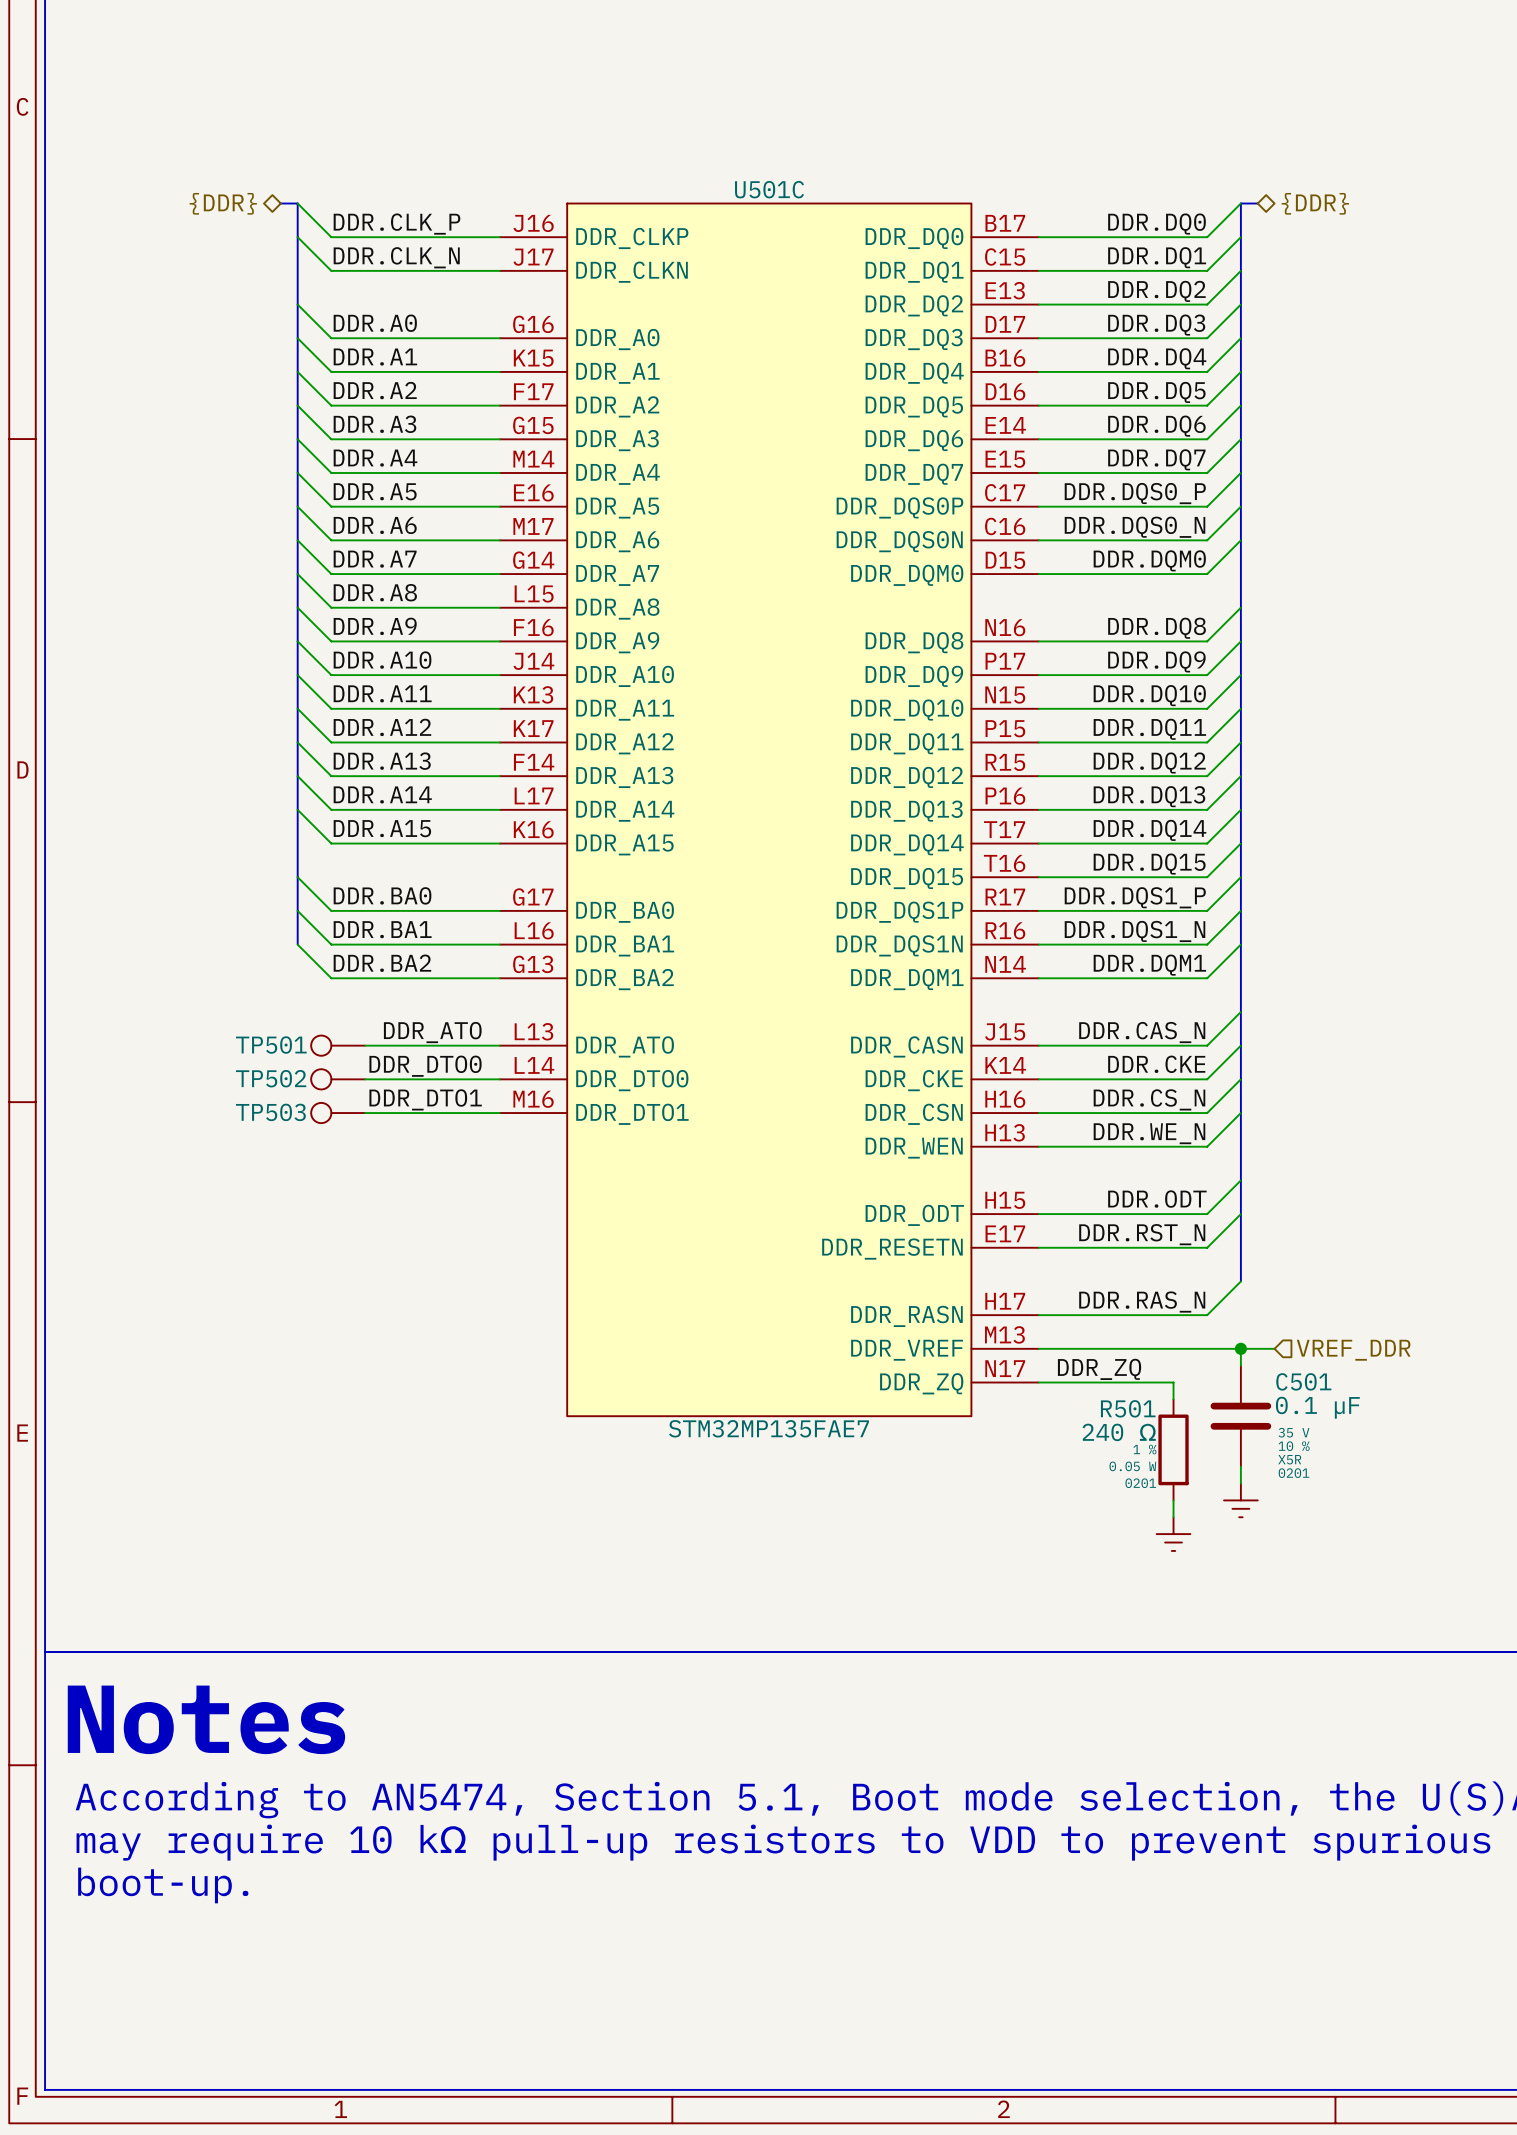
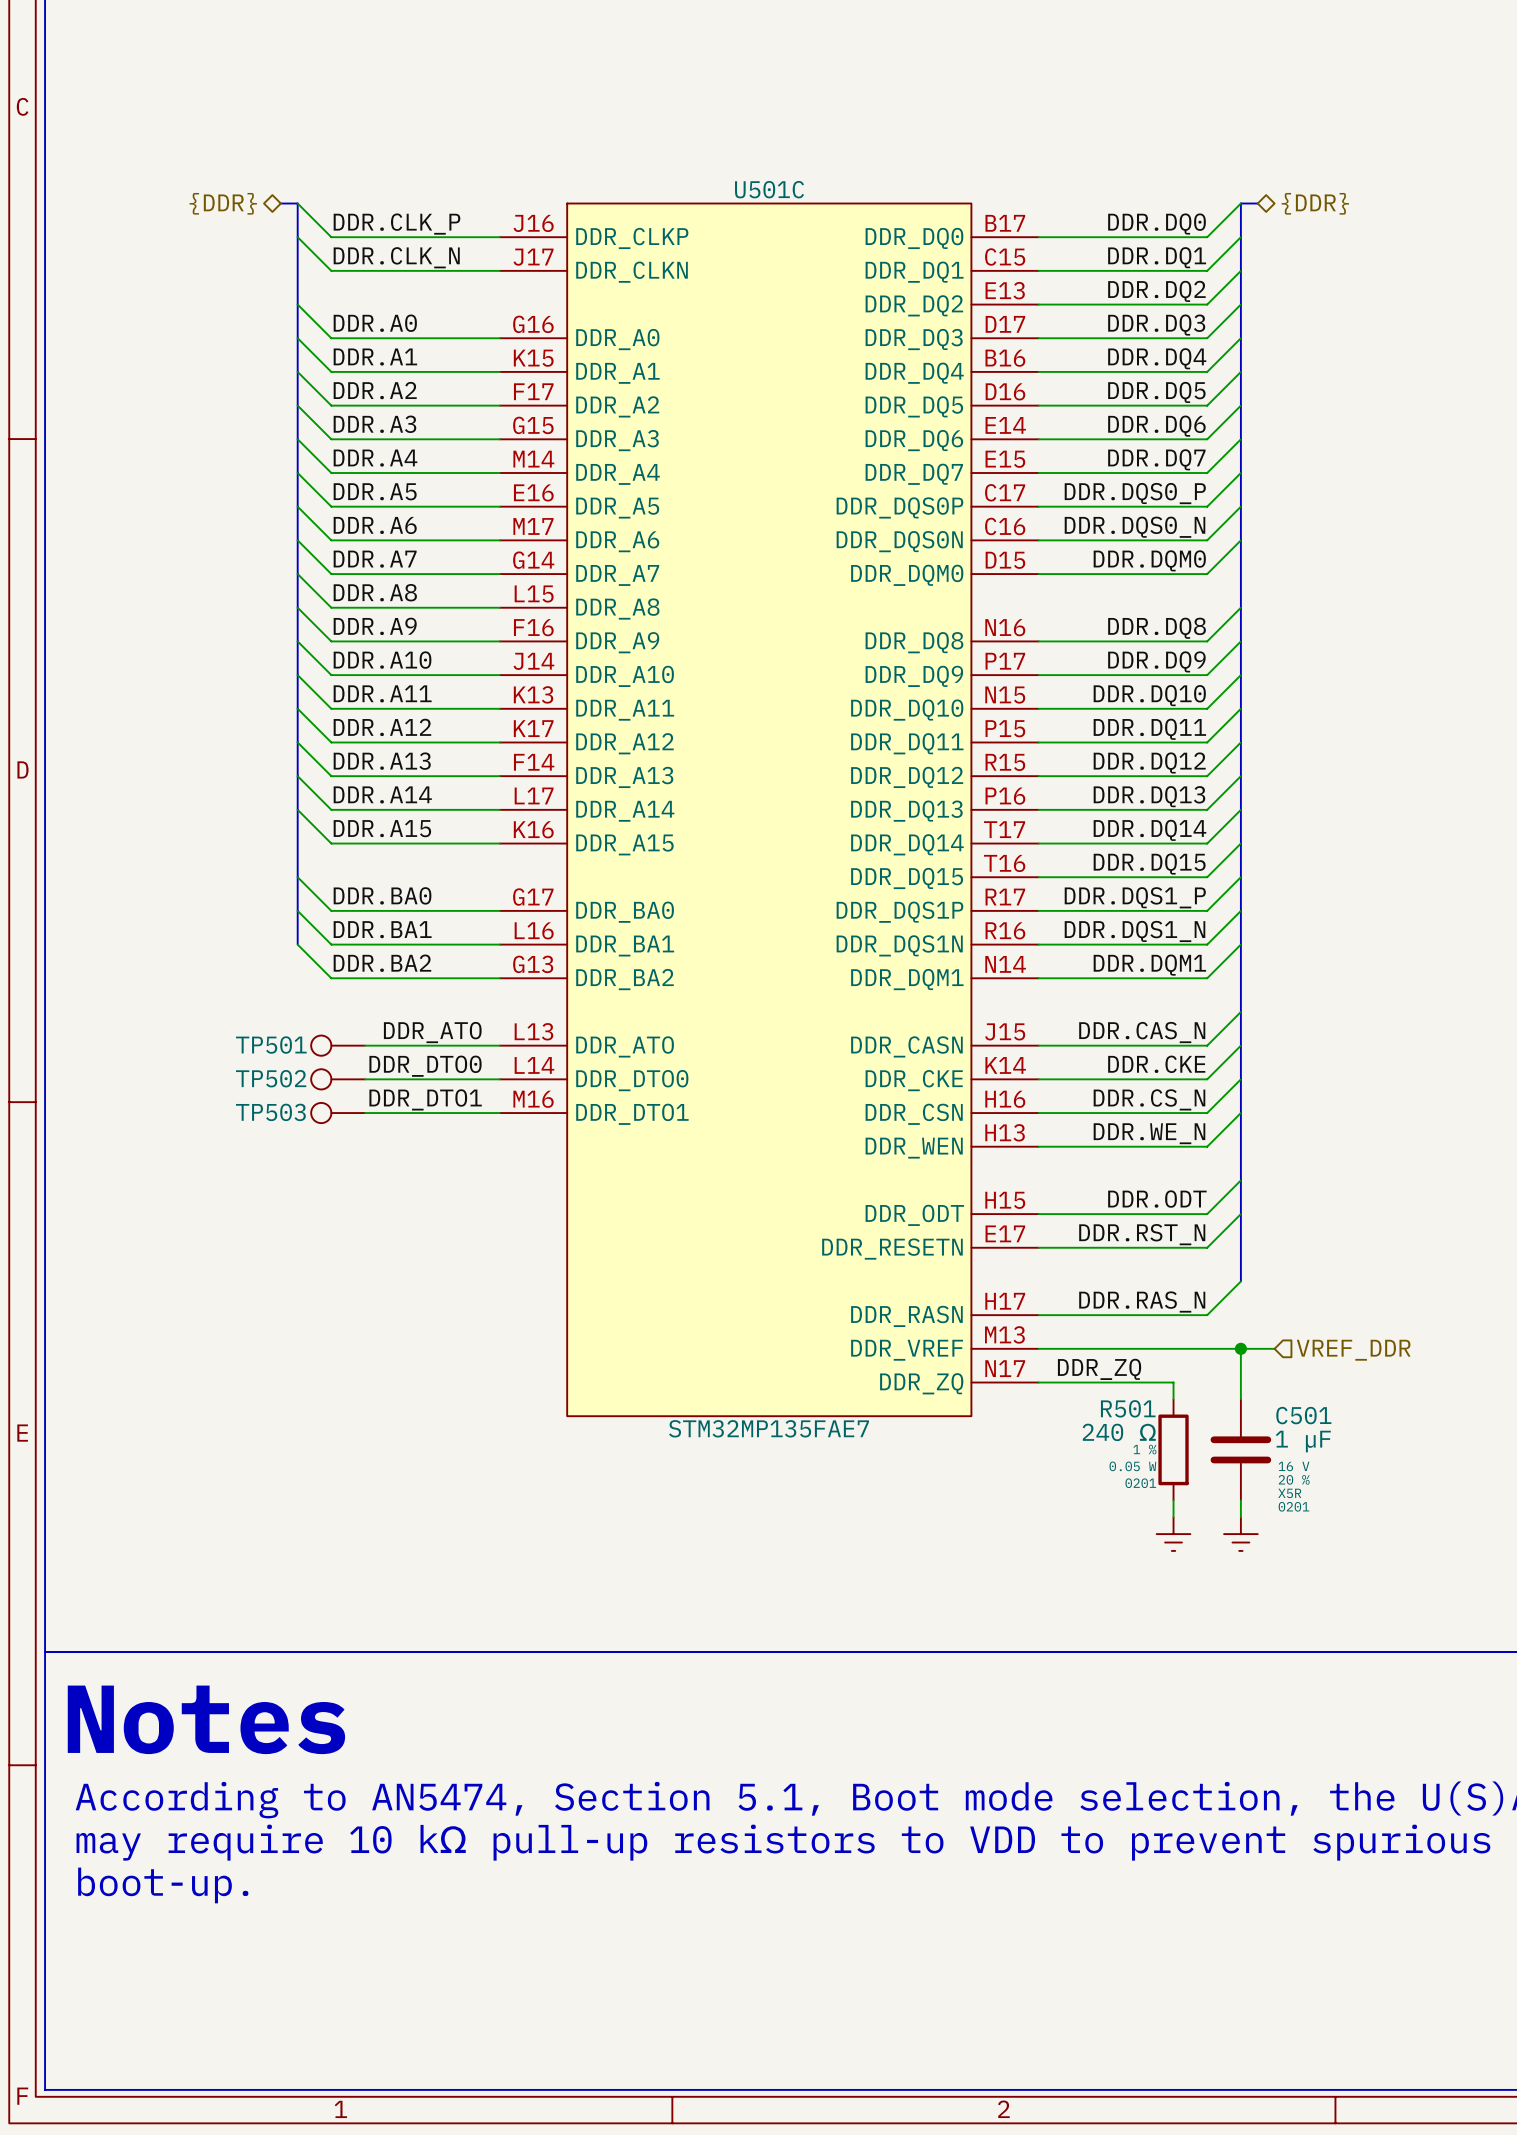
C501 value: 0.1 µF (1317, 1407) -> 1 µF (1303, 1441)
C501 position: (1240, 1416) -> (1240, 1449)
C501 text: 35 V (1293, 1432) -> 16 V (1294, 1466)
C501 text: 10 % (1294, 1446) -> 20 % (1294, 1479)
power symbol position: (1240, 1500) -> (1240, 1534)

